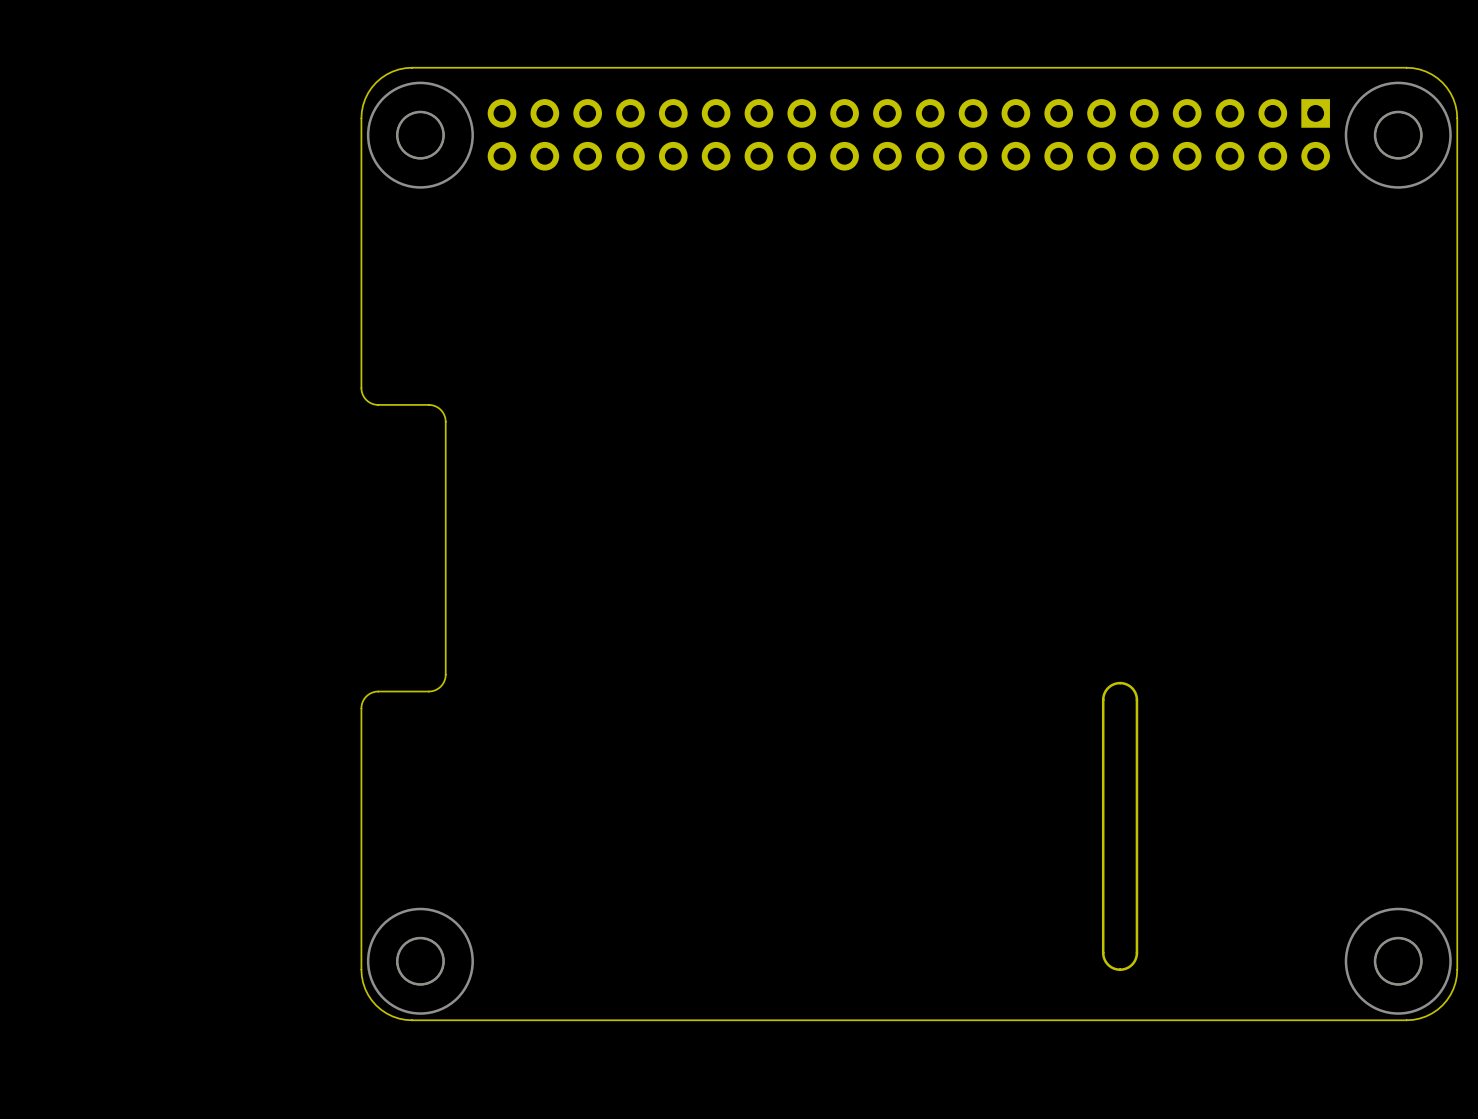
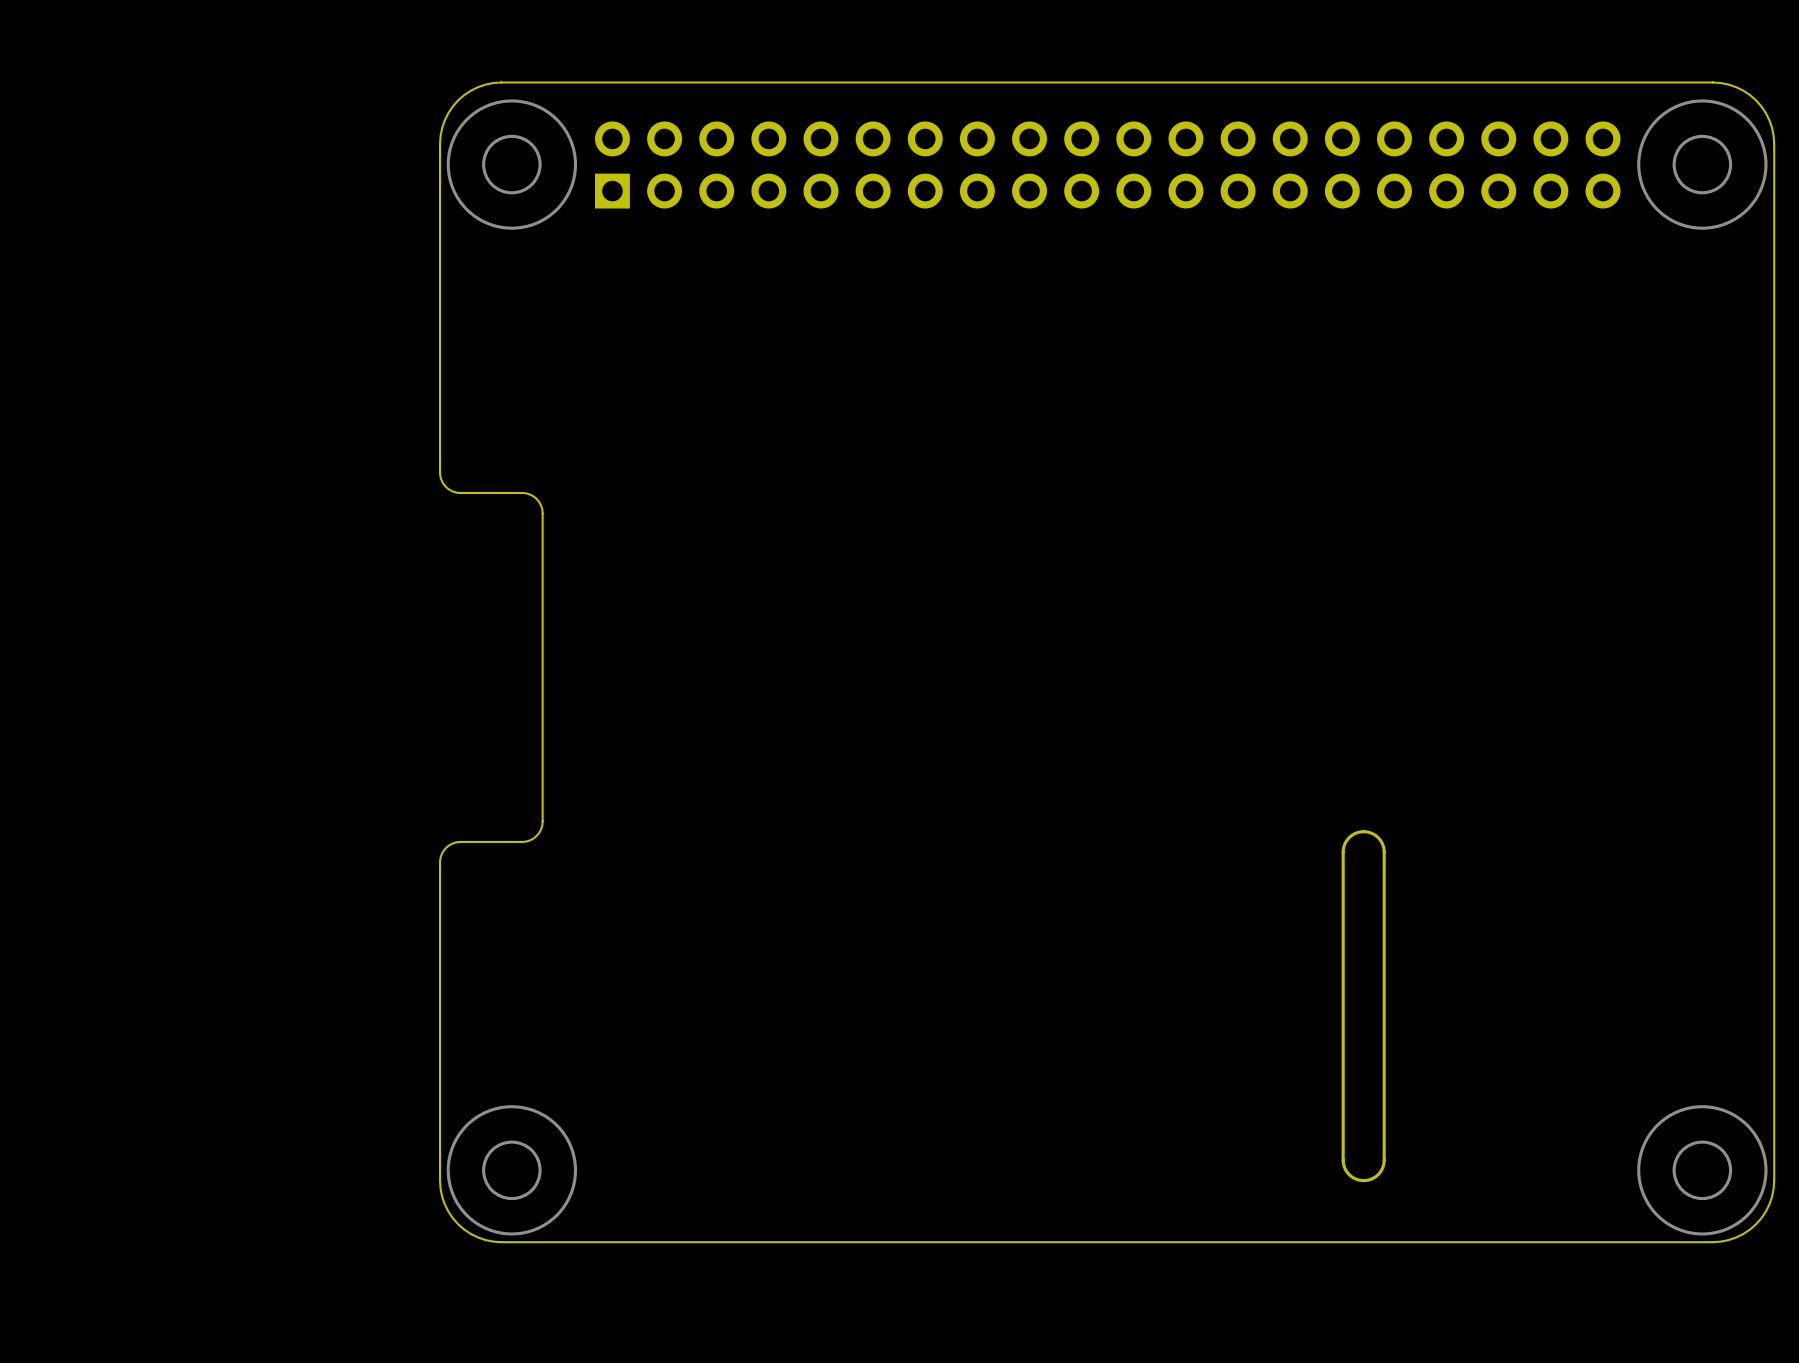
part rotation: 0° (908, 134) -> 180° (1107, 164)

